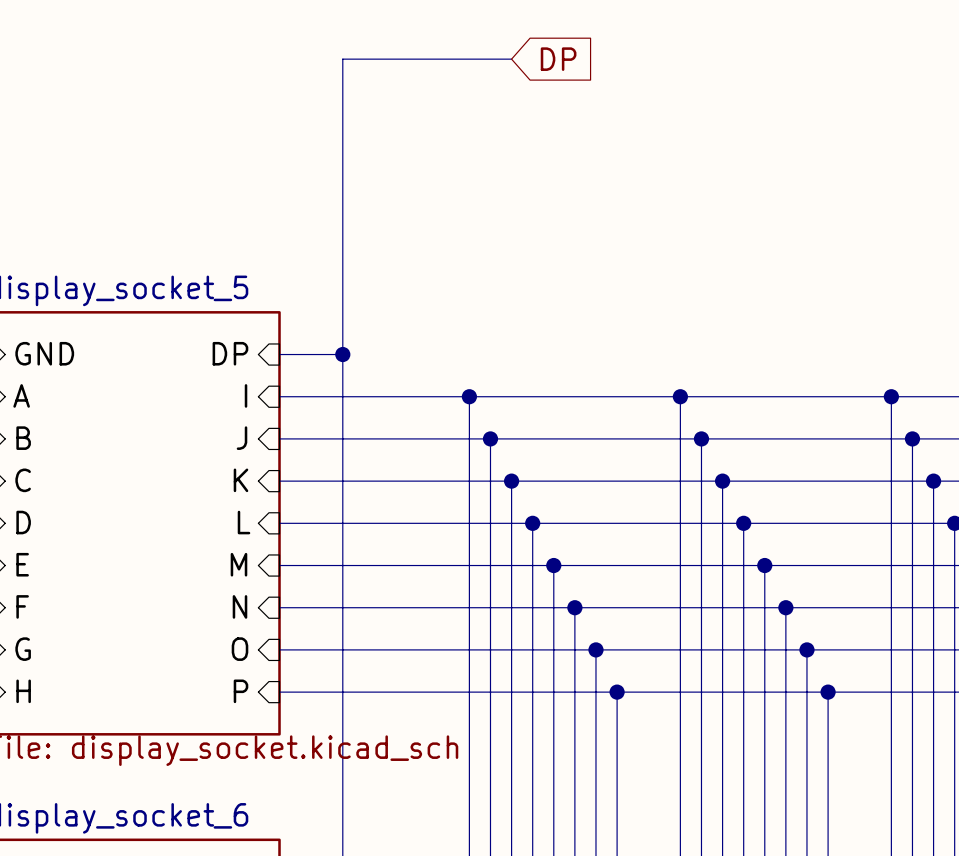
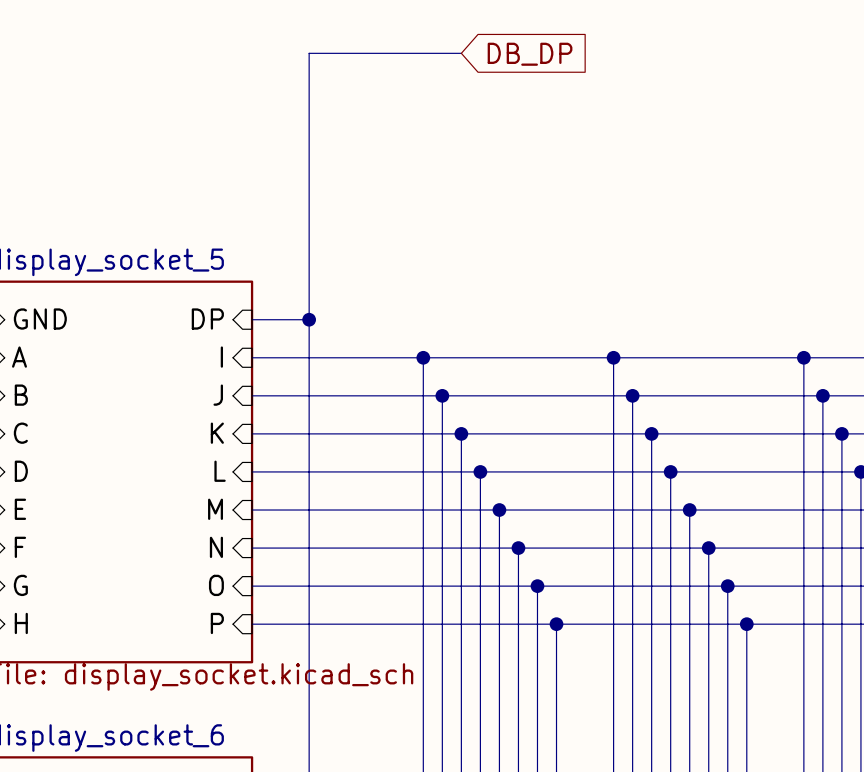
global label: DP (558, 59) -> DB_DP (530, 54)

